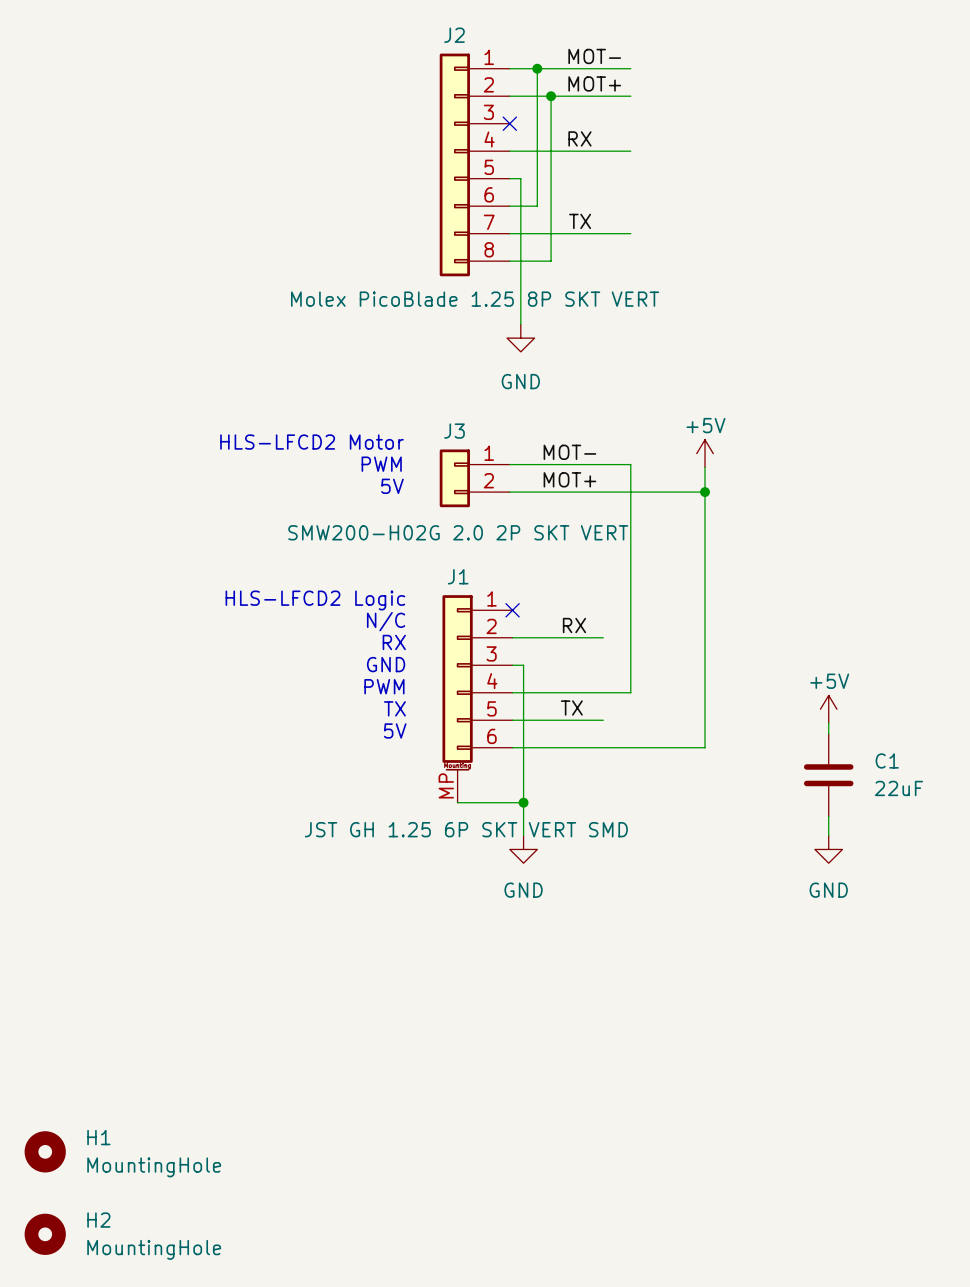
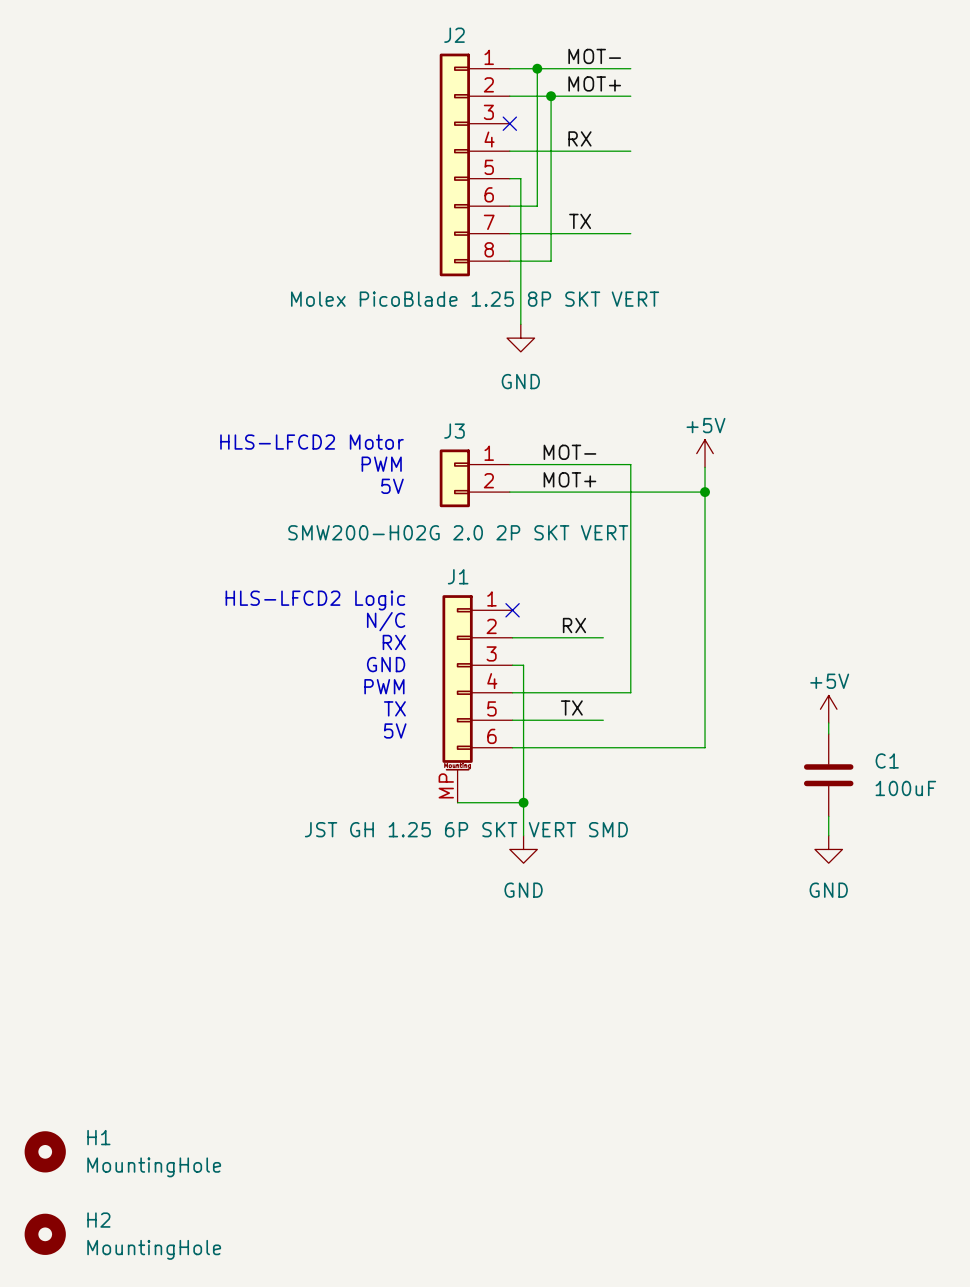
C1 value: 22uF (898, 788) -> 100uF (905, 788)

